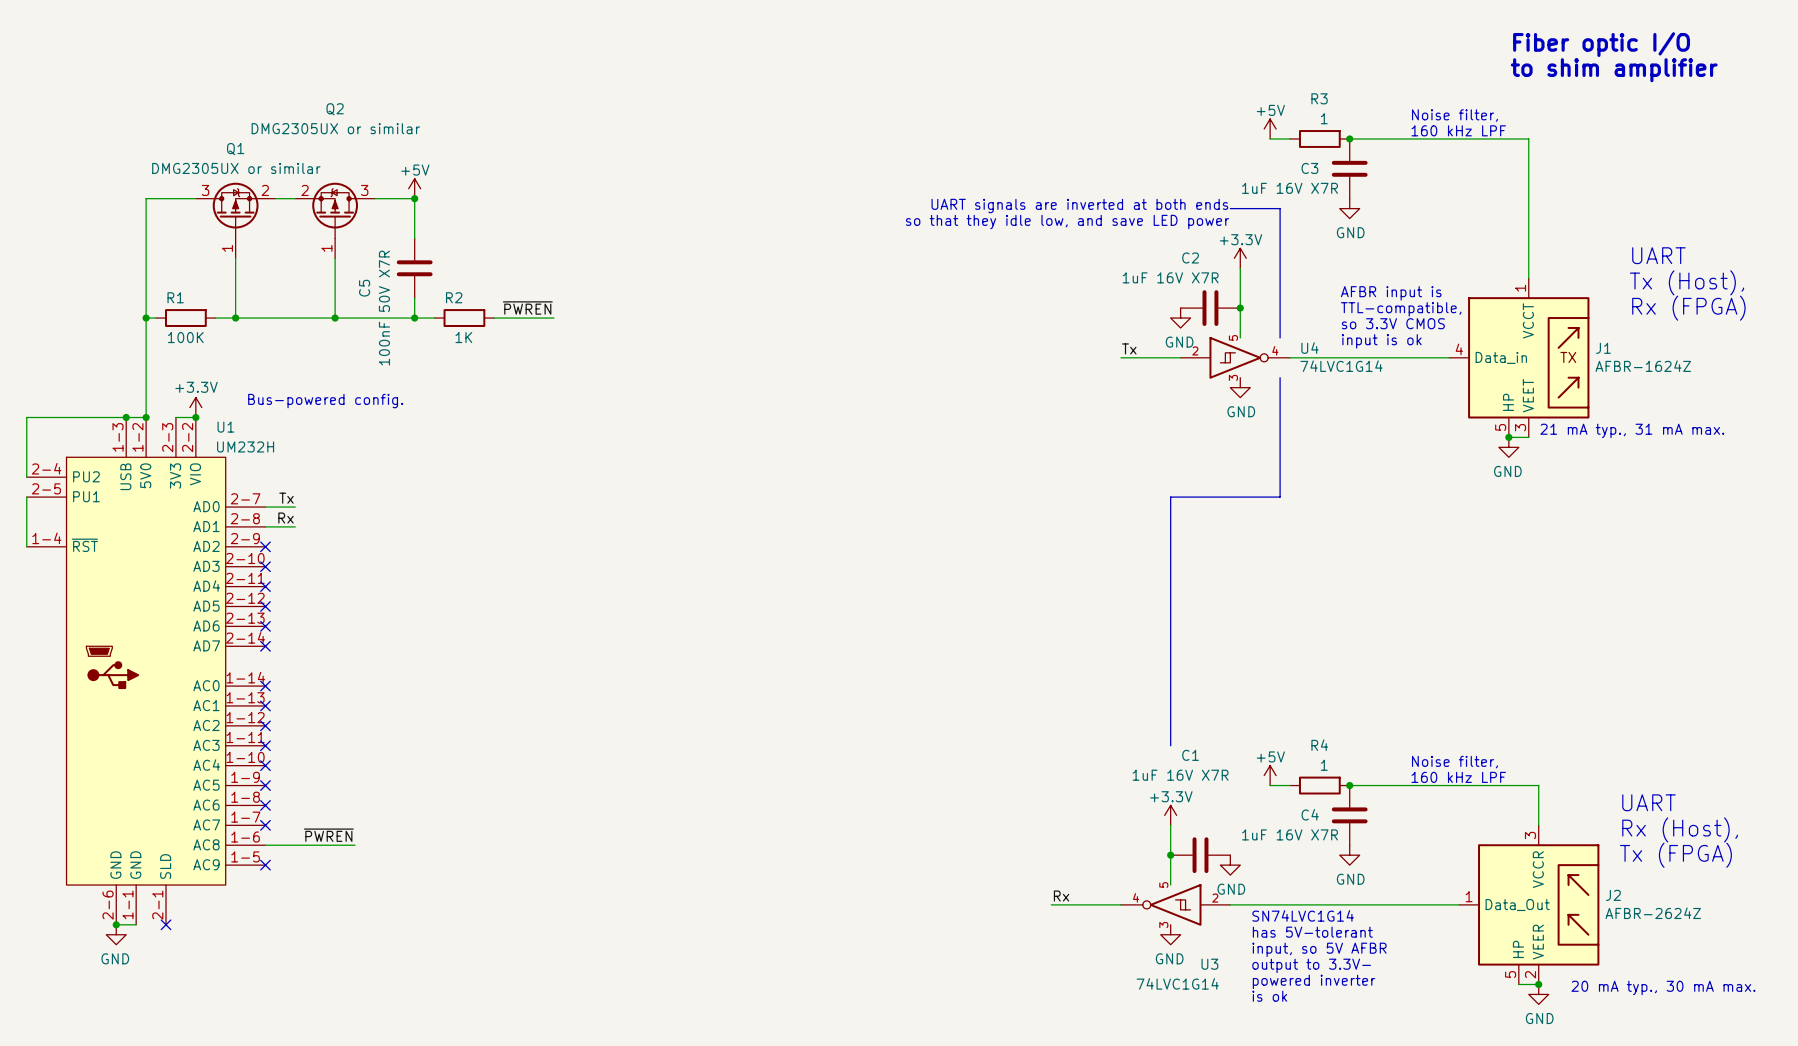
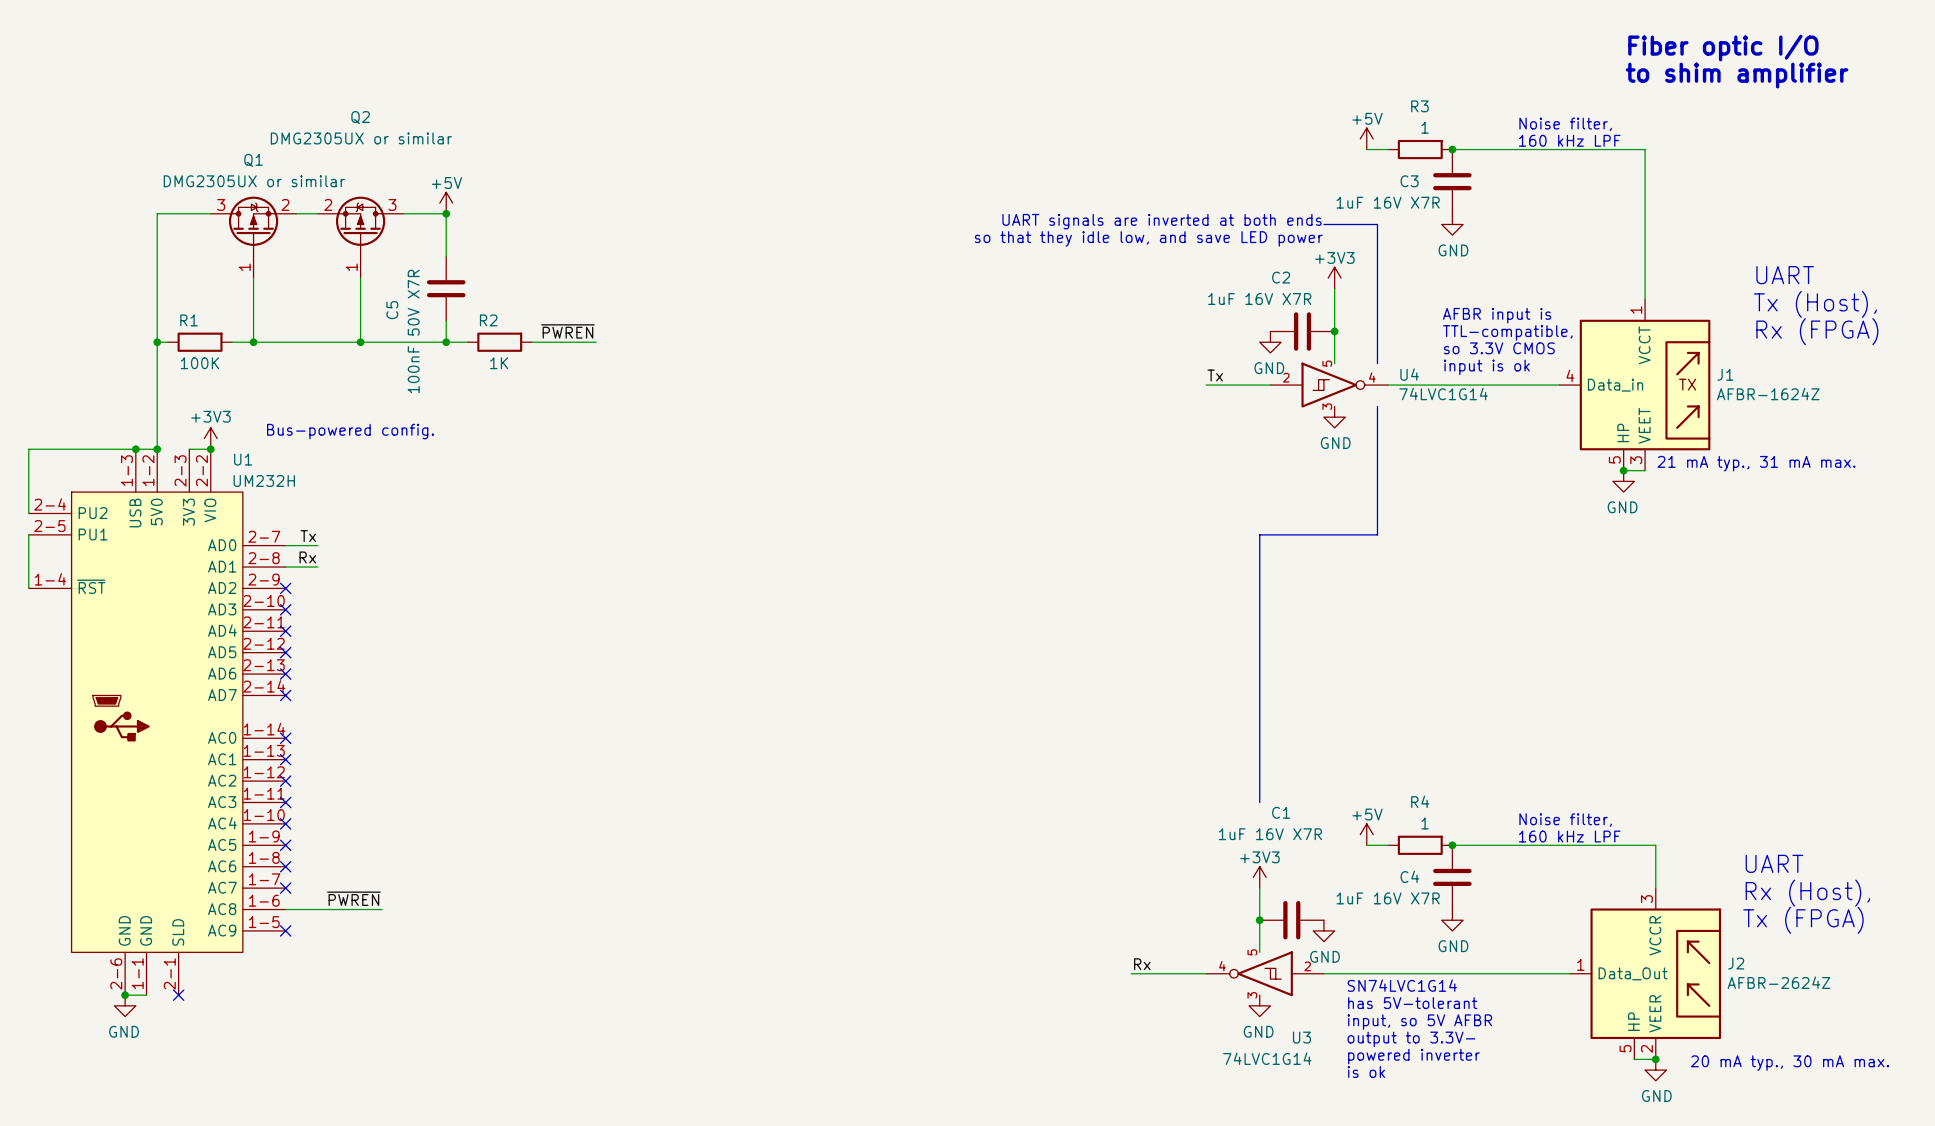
power symbol: +3.3V (1240, 258) -> +3V3 (1334, 278)
power symbol: +3.3V (195, 407) -> +3V3 (210, 438)
power symbol: +3.3V (1170, 815) -> +3V3 (1259, 877)

